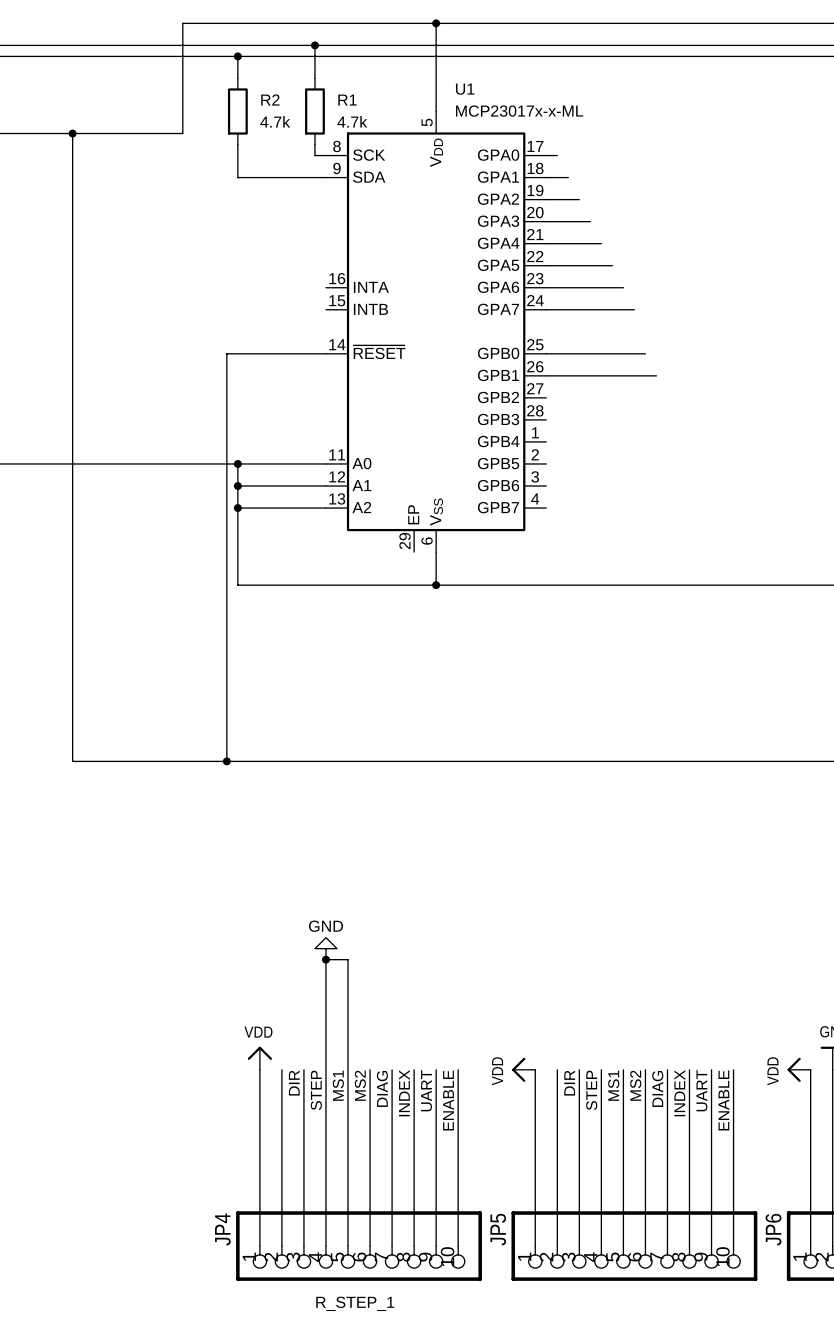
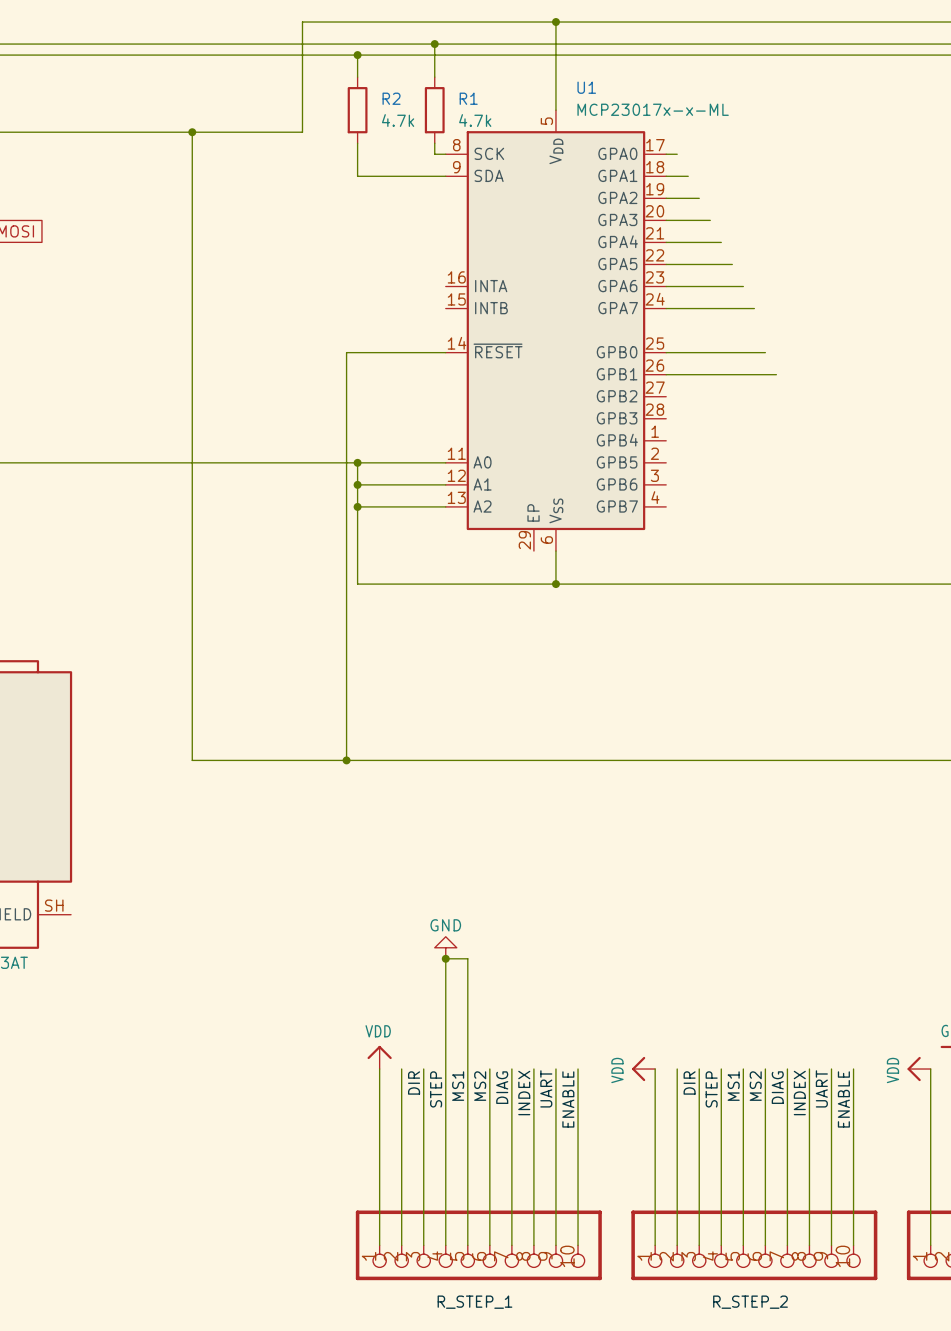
JP4 name: JP4 (222, 1229) -> none
JP5 name: JP5 (498, 1229) -> none
JP6 name: JP6 (773, 1229) -> none
label: none -> R_STEP_2 (750, 1302)

